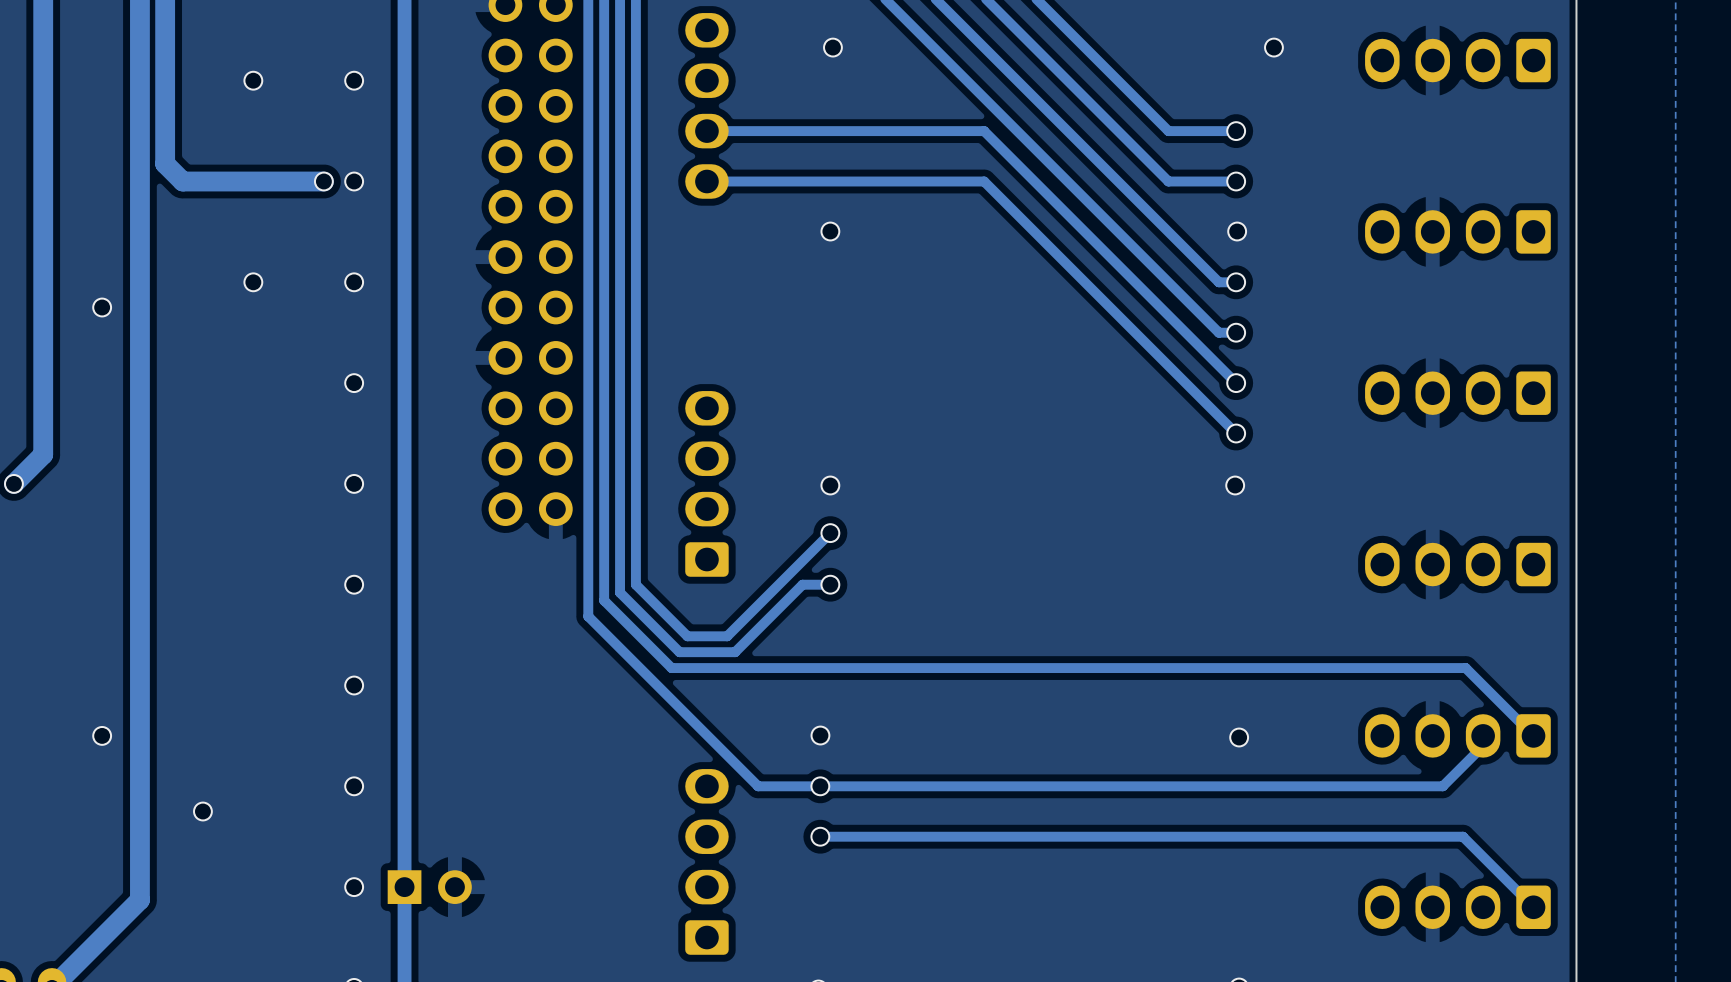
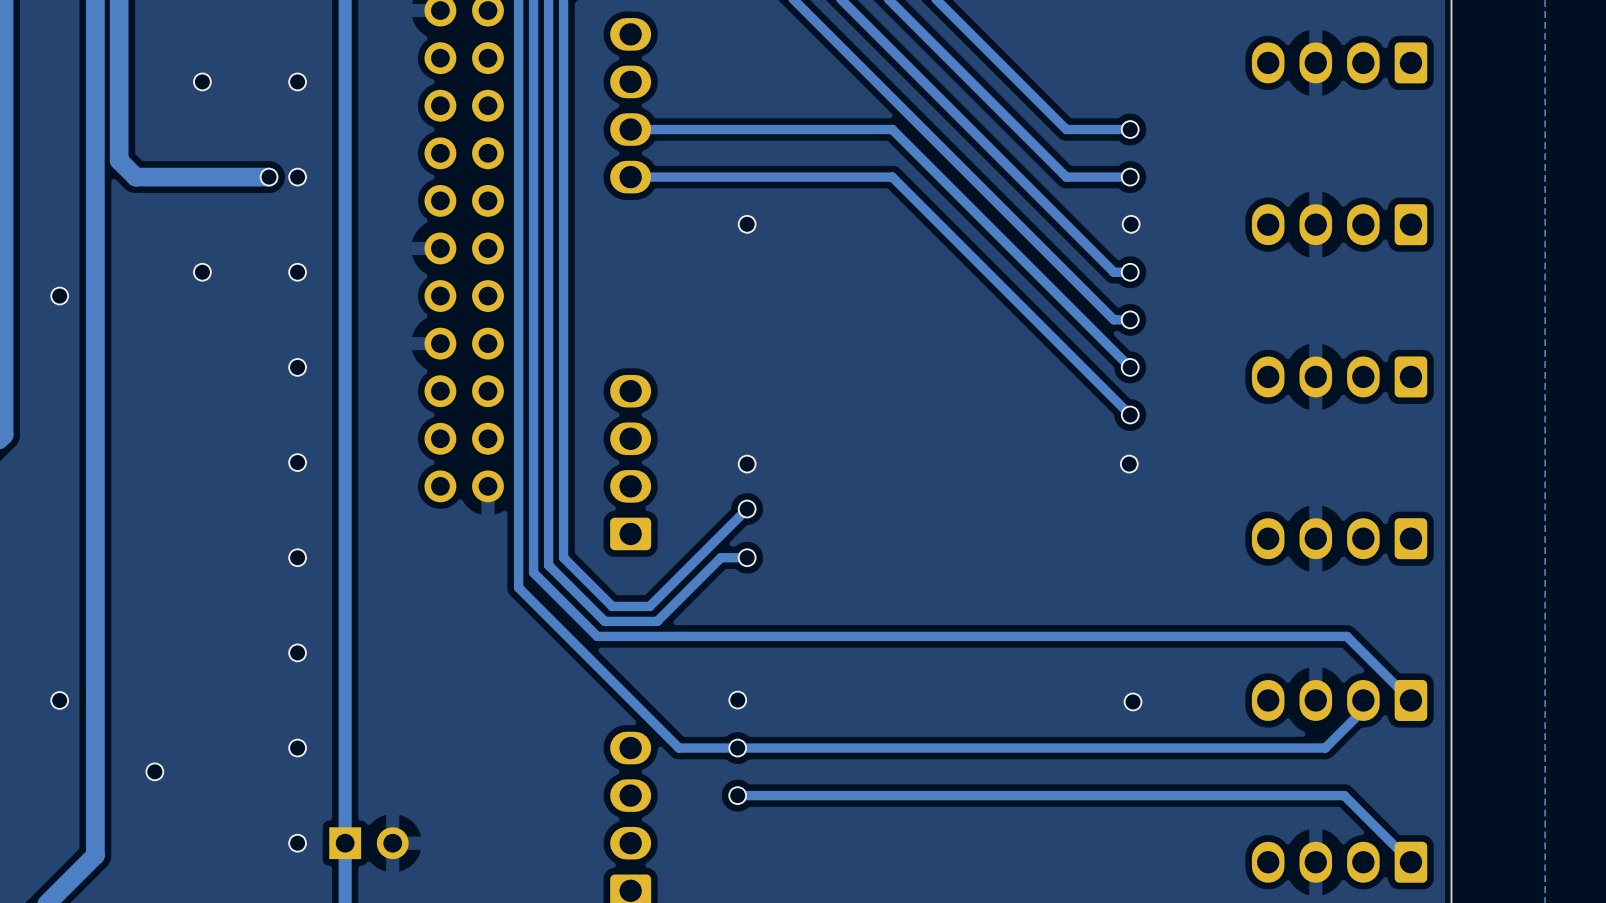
via: (832, 47) -> none
via: (1273, 47) -> none

